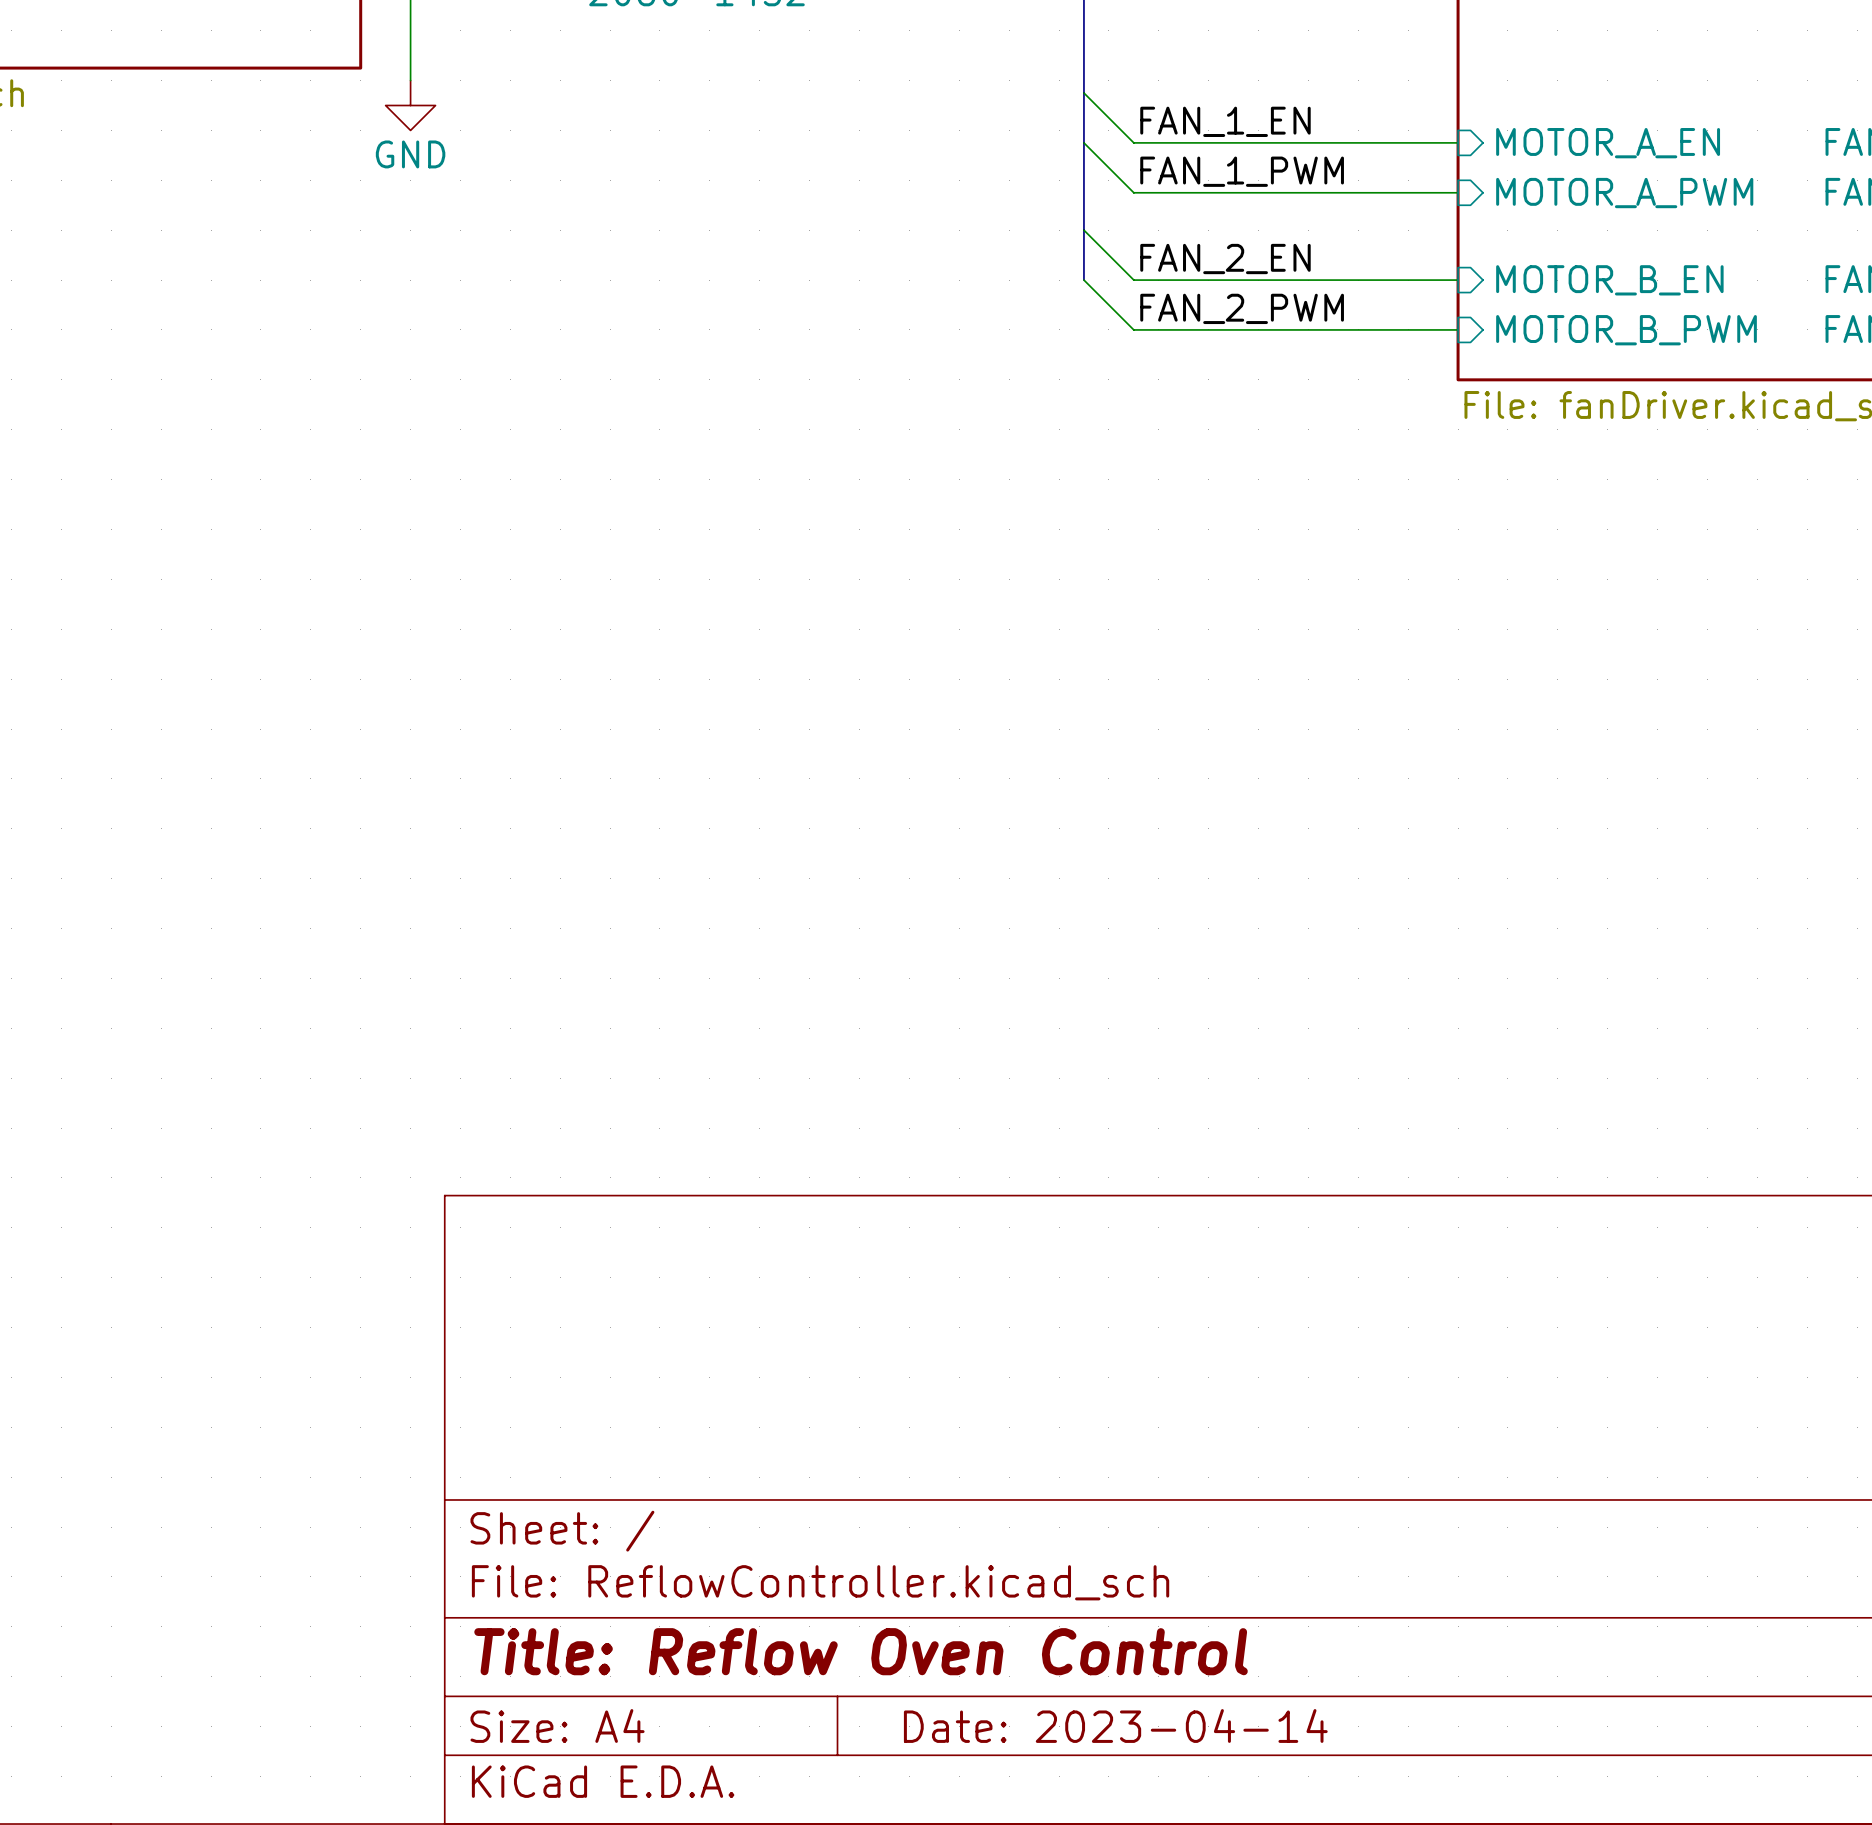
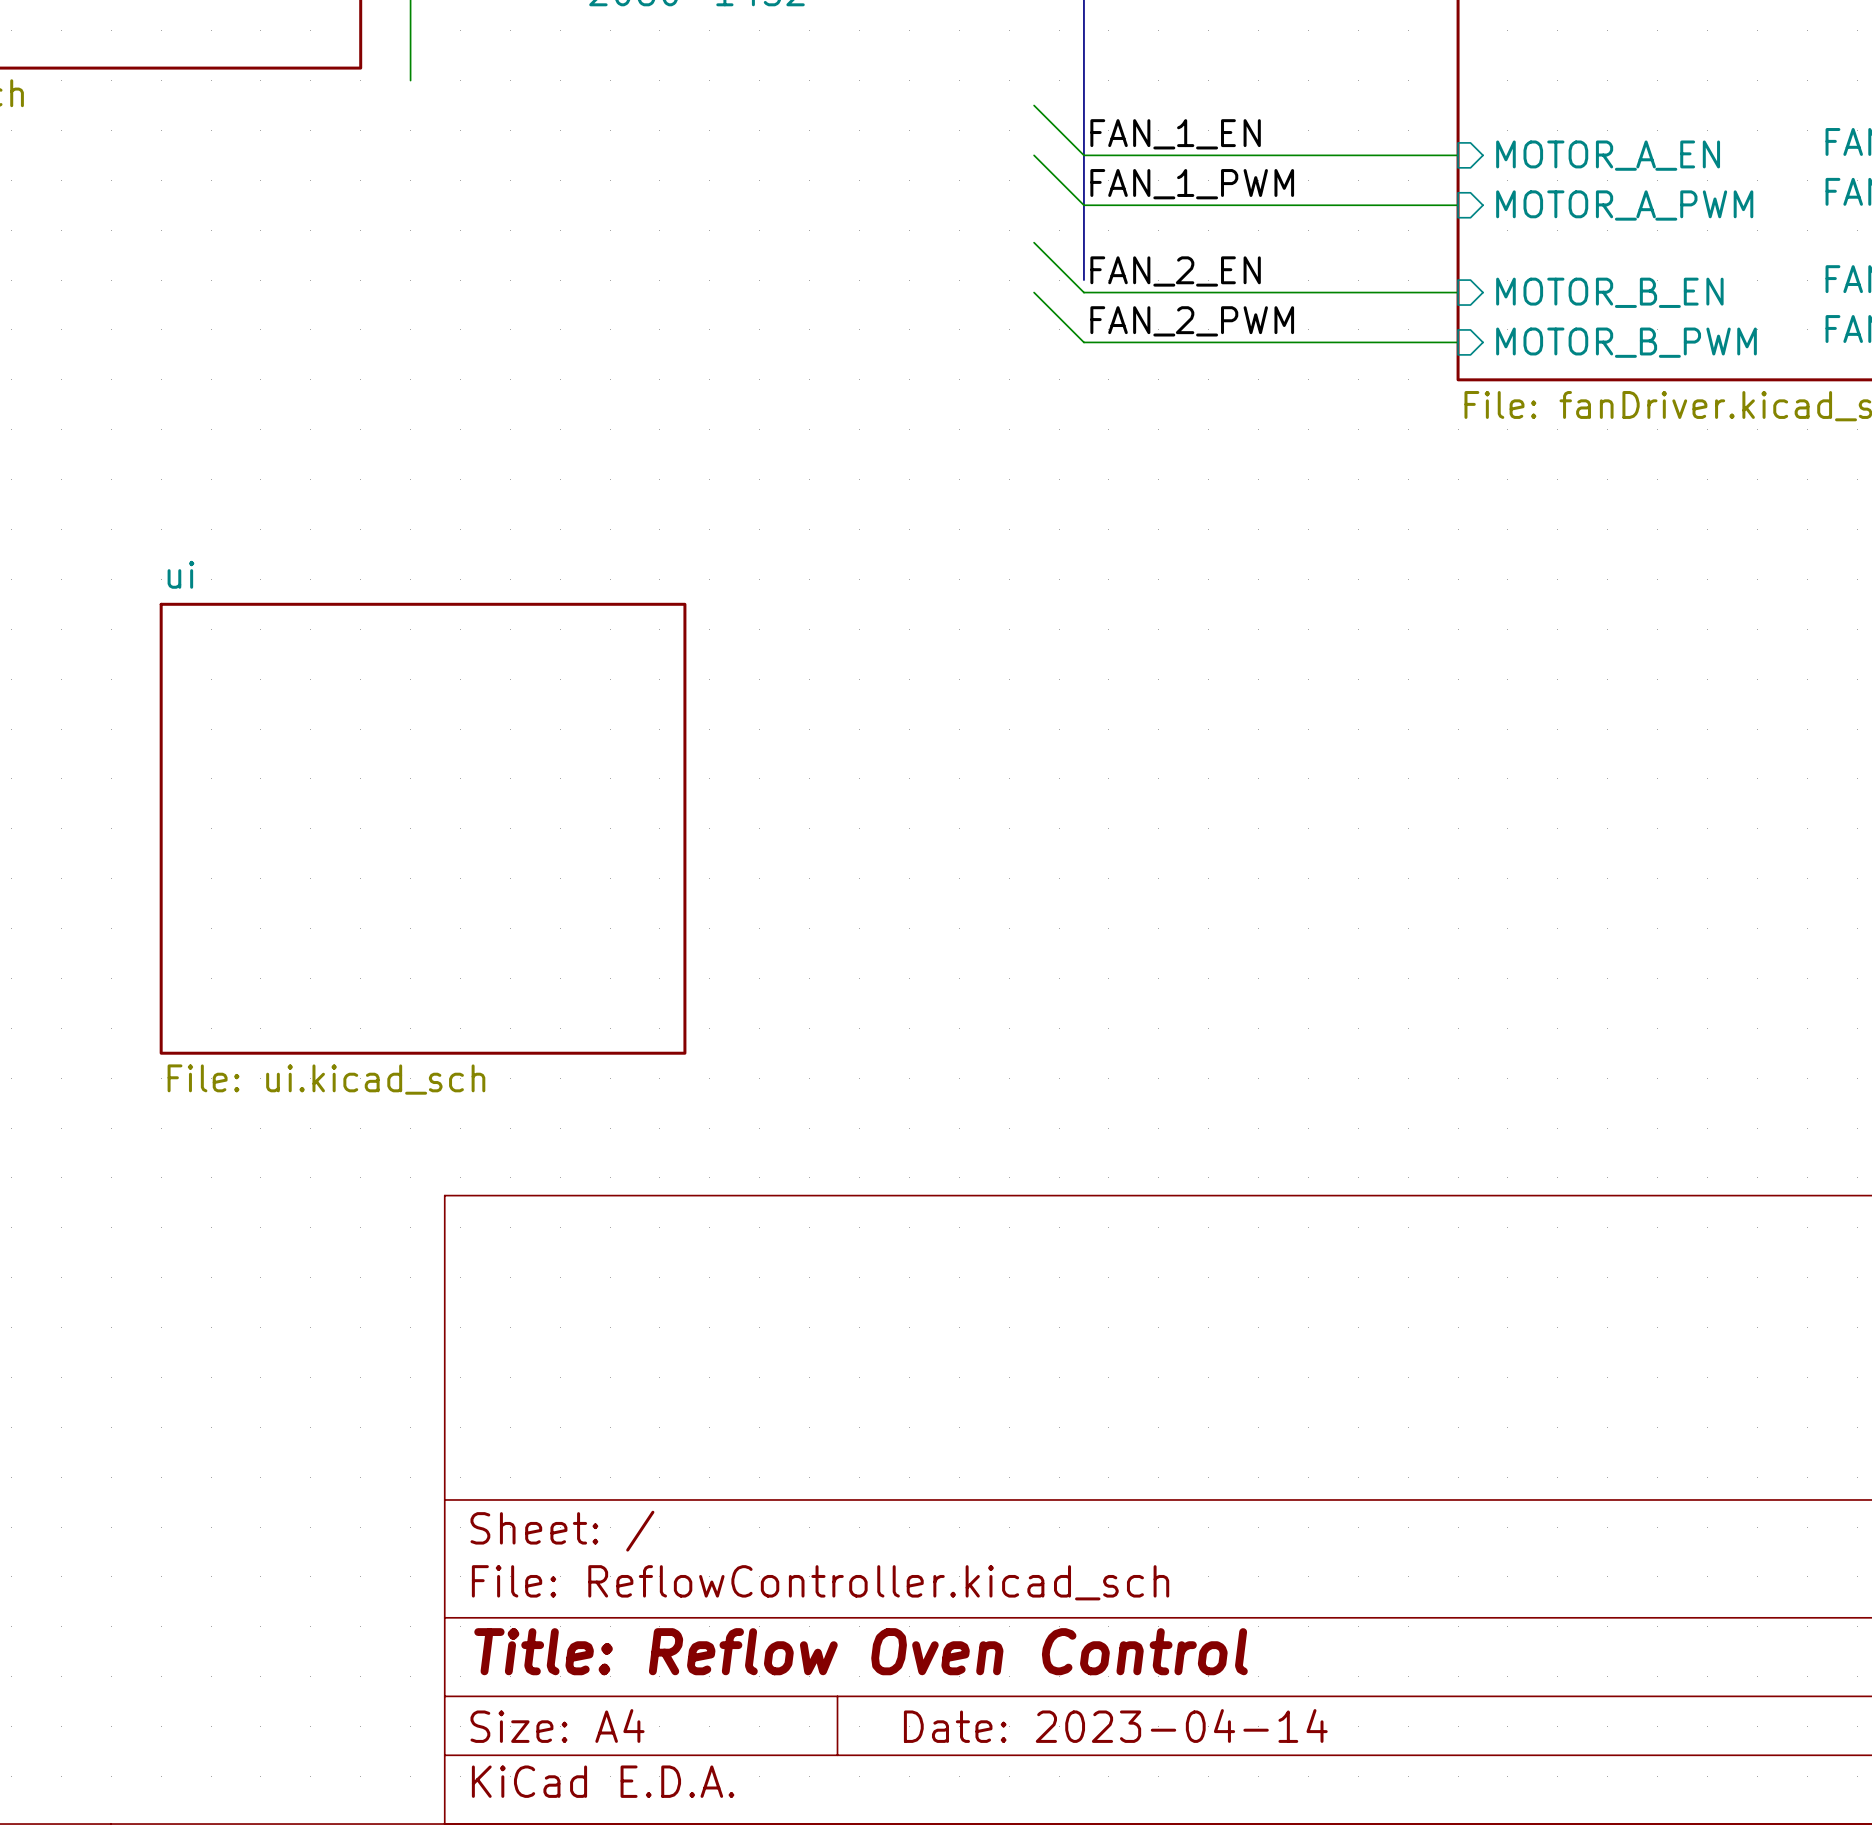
wire: (1083, 93) (1133, 142) -> none
power symbol: GND (410, 105) -> none
wire: none -> (1034, 105) (1083, 155) (1458, 155)
label position: FAN_1_EN (1225, 121) -> FAN_1_EN (1175, 134)
wire: (1083, 142) (1133, 192) (1458, 192) -> none
wire: (1133, 142) (1458, 142) -> none
sheet pin position: MOTOR_A_EN (1608, 143) -> MOTOR_A_EN (1608, 155)
wire: none -> (1034, 155) (1083, 205) (1458, 205)
label position: FAN_1_PWM (1242, 171) -> FAN_1_PWM (1192, 184)
sheet pin position: MOTOR_A_PWM (1624, 193) -> MOTOR_A_PWM (1624, 205)
wire: (1083, 230) (1133, 280) (1458, 280) -> none
wire: none -> (1034, 242) (1083, 292) (1458, 292)
label position: FAN_2_EN (1225, 259) -> FAN_2_EN (1175, 271)
wire: (1083, 280) (1133, 329) (1458, 329) -> none
sheet pin position: MOTOR_B_EN (1609, 280) -> MOTOR_B_EN (1609, 292)
wire: none -> (1034, 292) (1083, 342) (1458, 342)
label position: FAN_2_PWM (1242, 308) -> FAN_2_PWM (1192, 321)
sheet pin position: MOTOR_B_PWM (1626, 330) -> MOTOR_B_PWM (1626, 342)
sheet ui: none -> File: ui.kicad_sch (423, 828)

